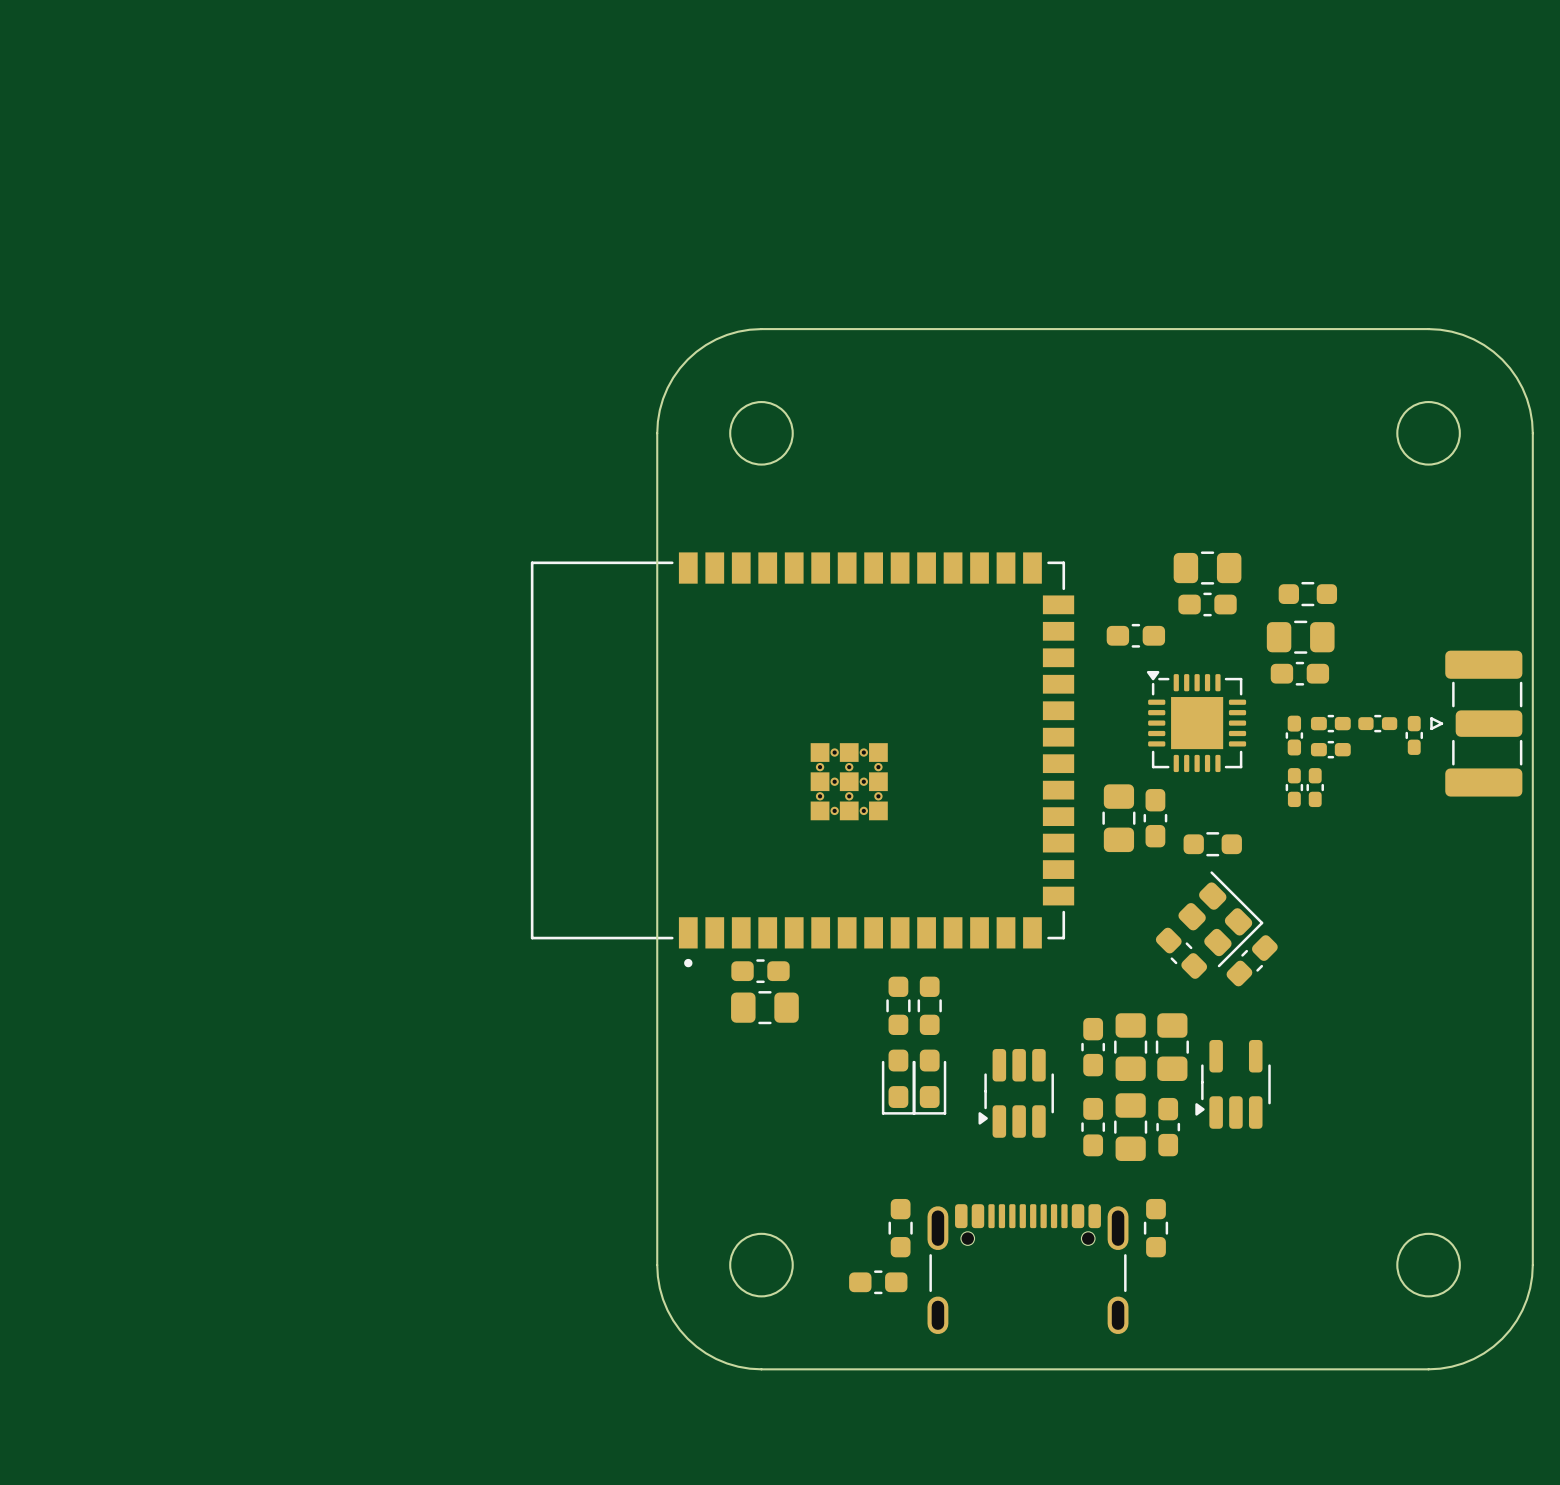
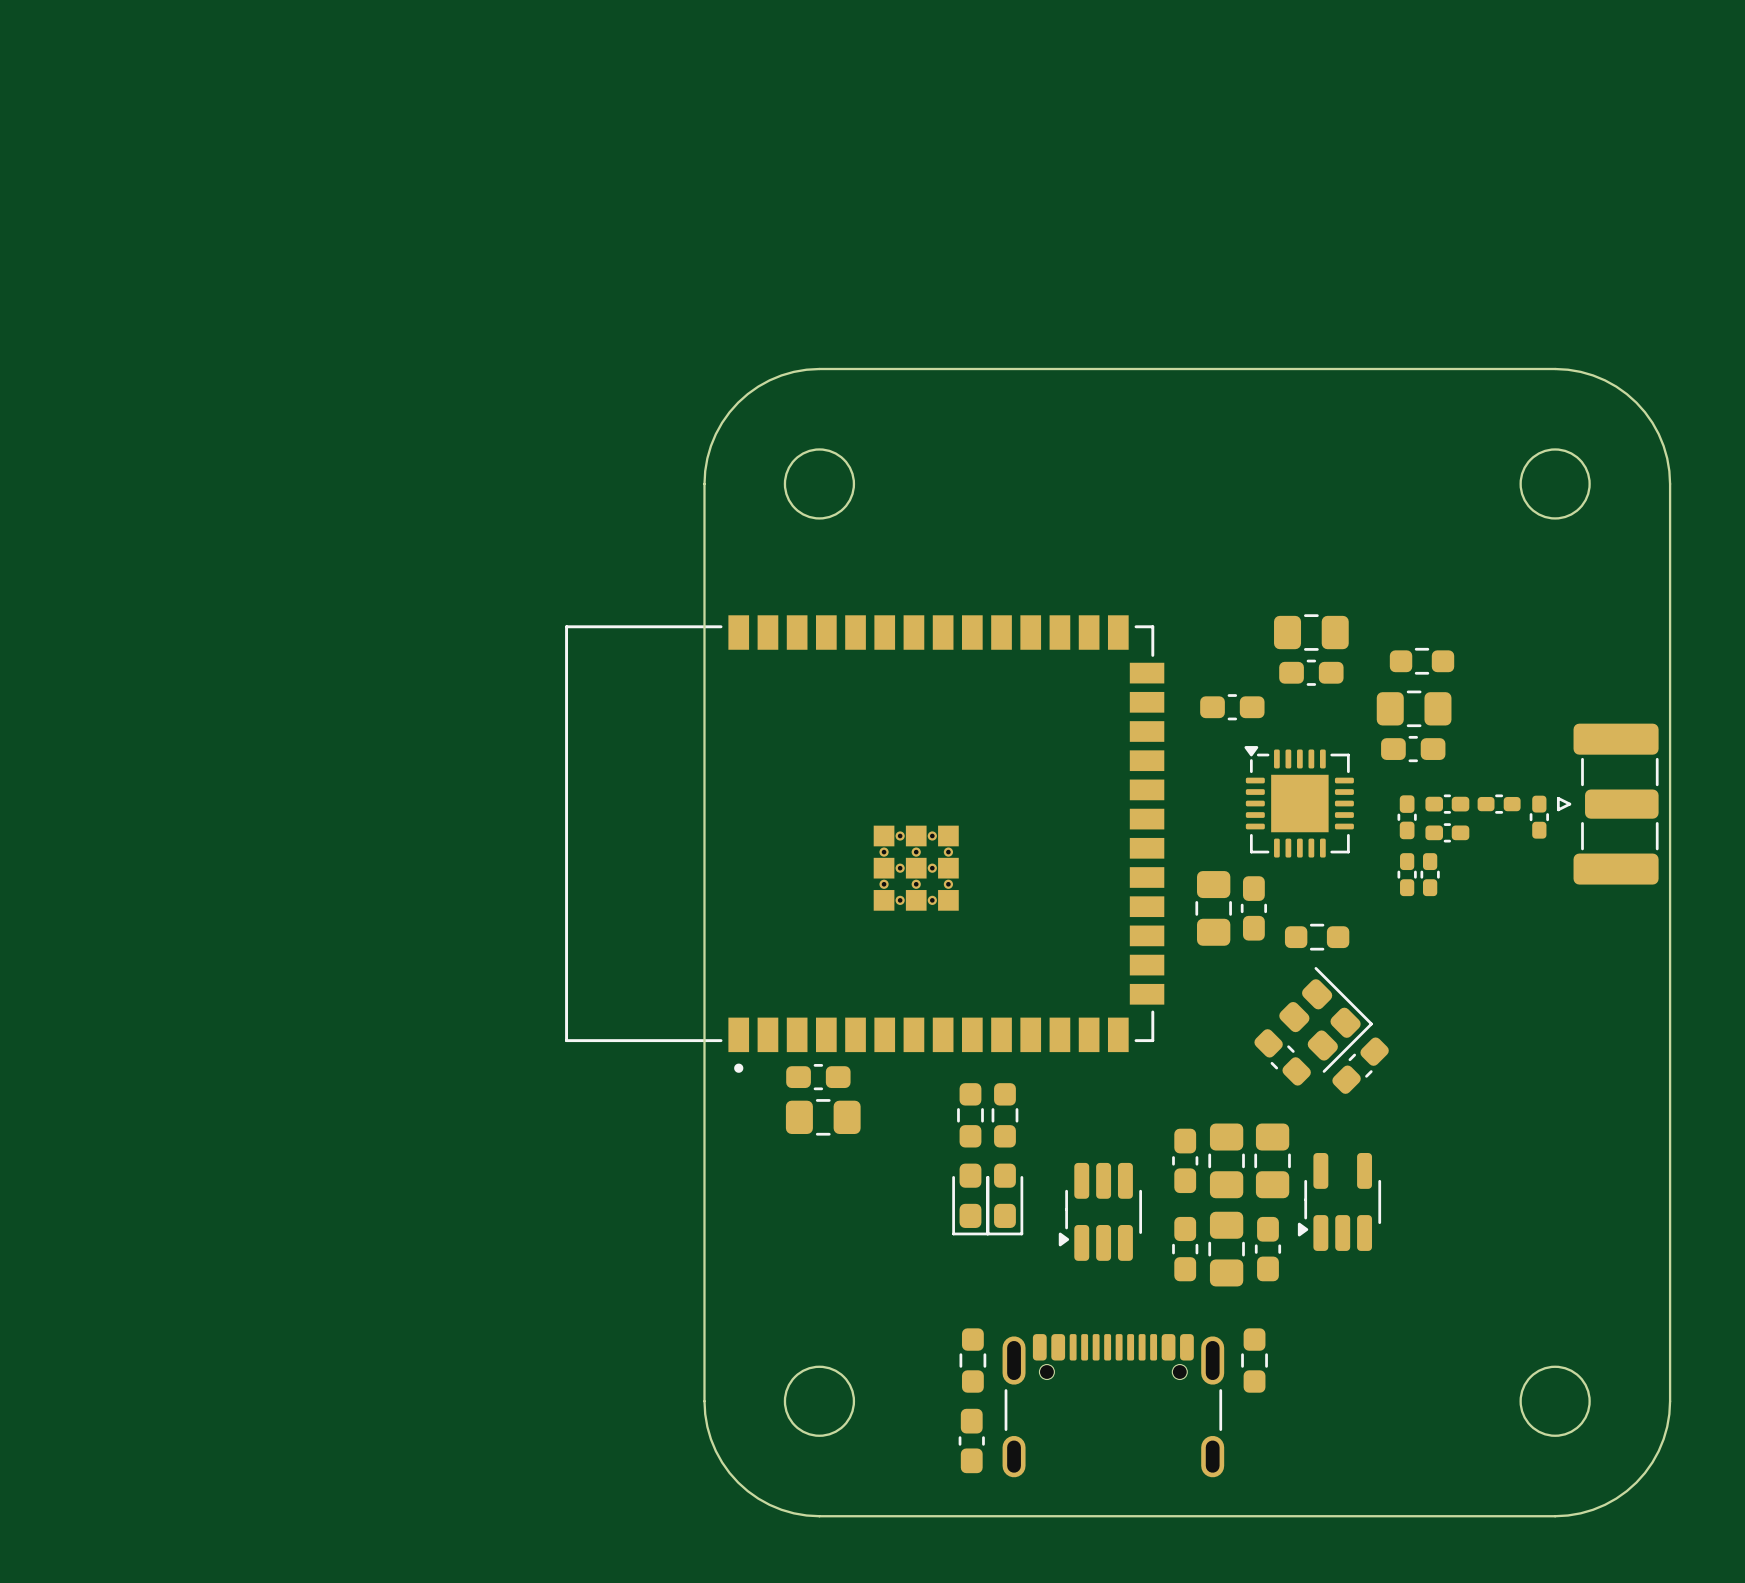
part rotation: 0° (878, 1282) -> 90° clockwise (971, 1440)

